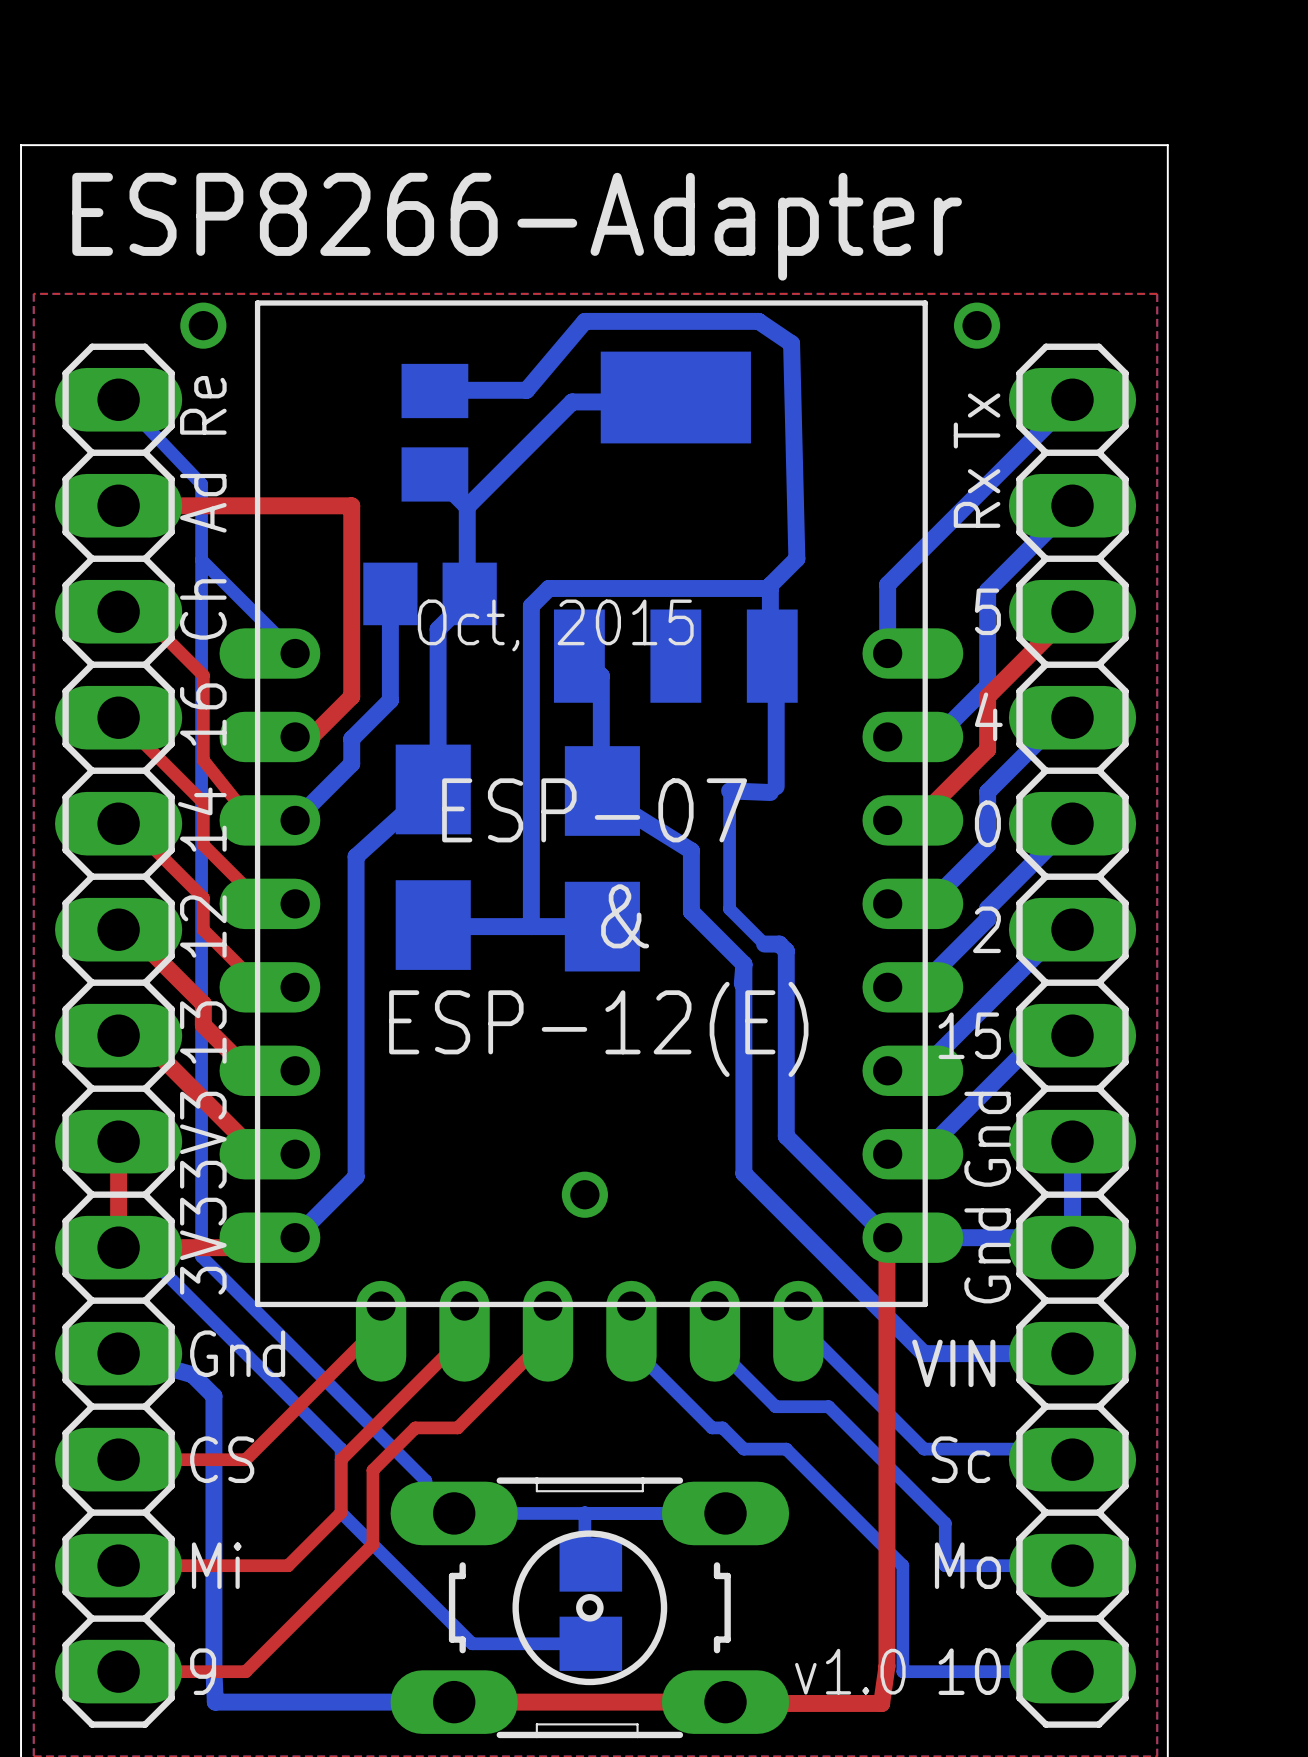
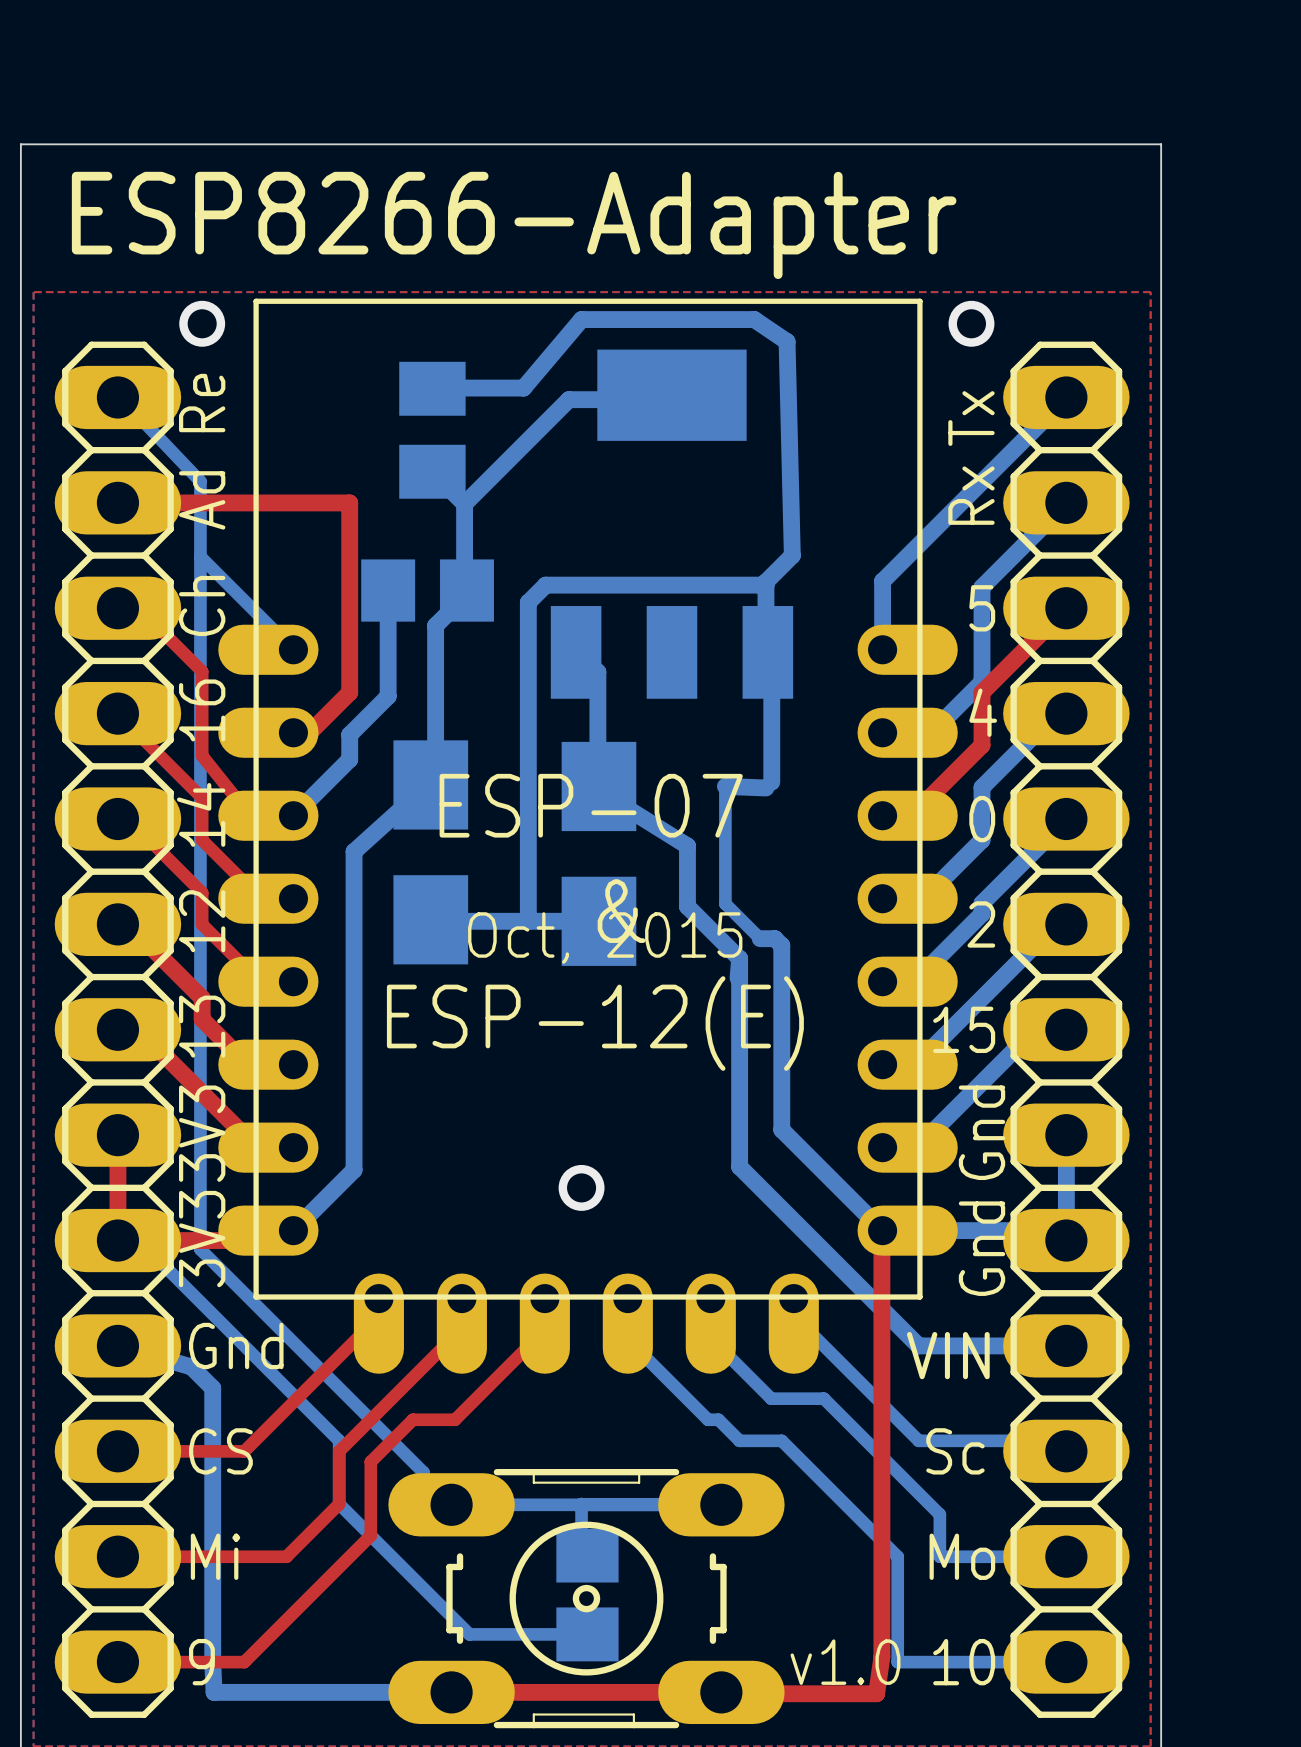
text position: Oct, 2015 (555, 625) -> Oct, 2015 (605, 938)

